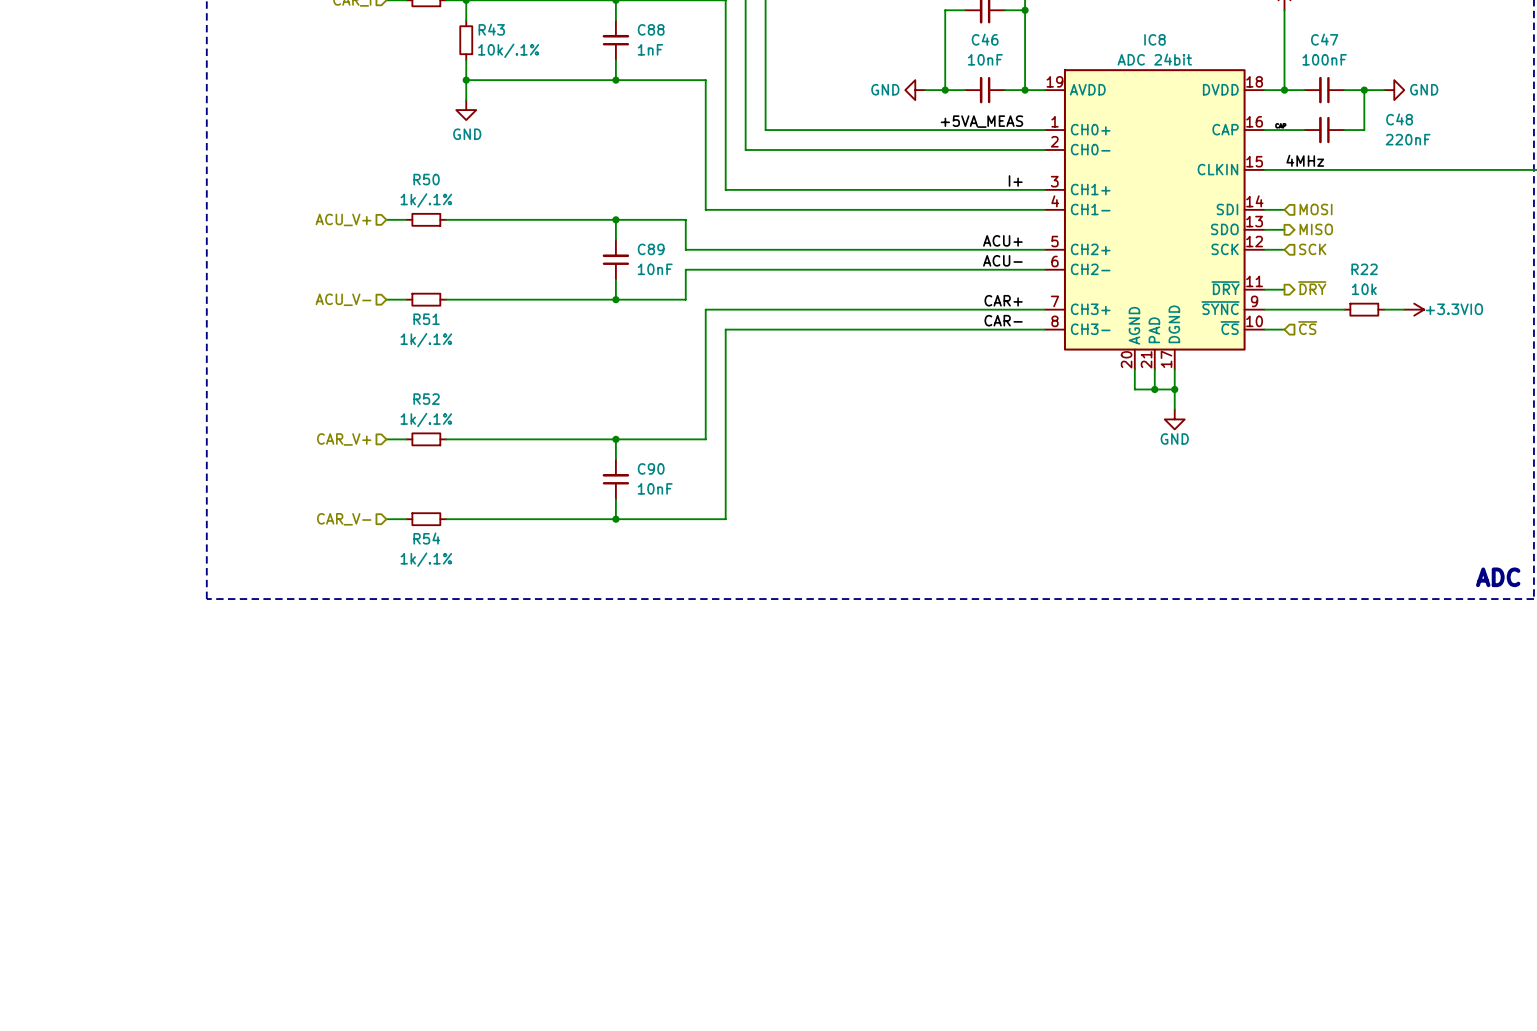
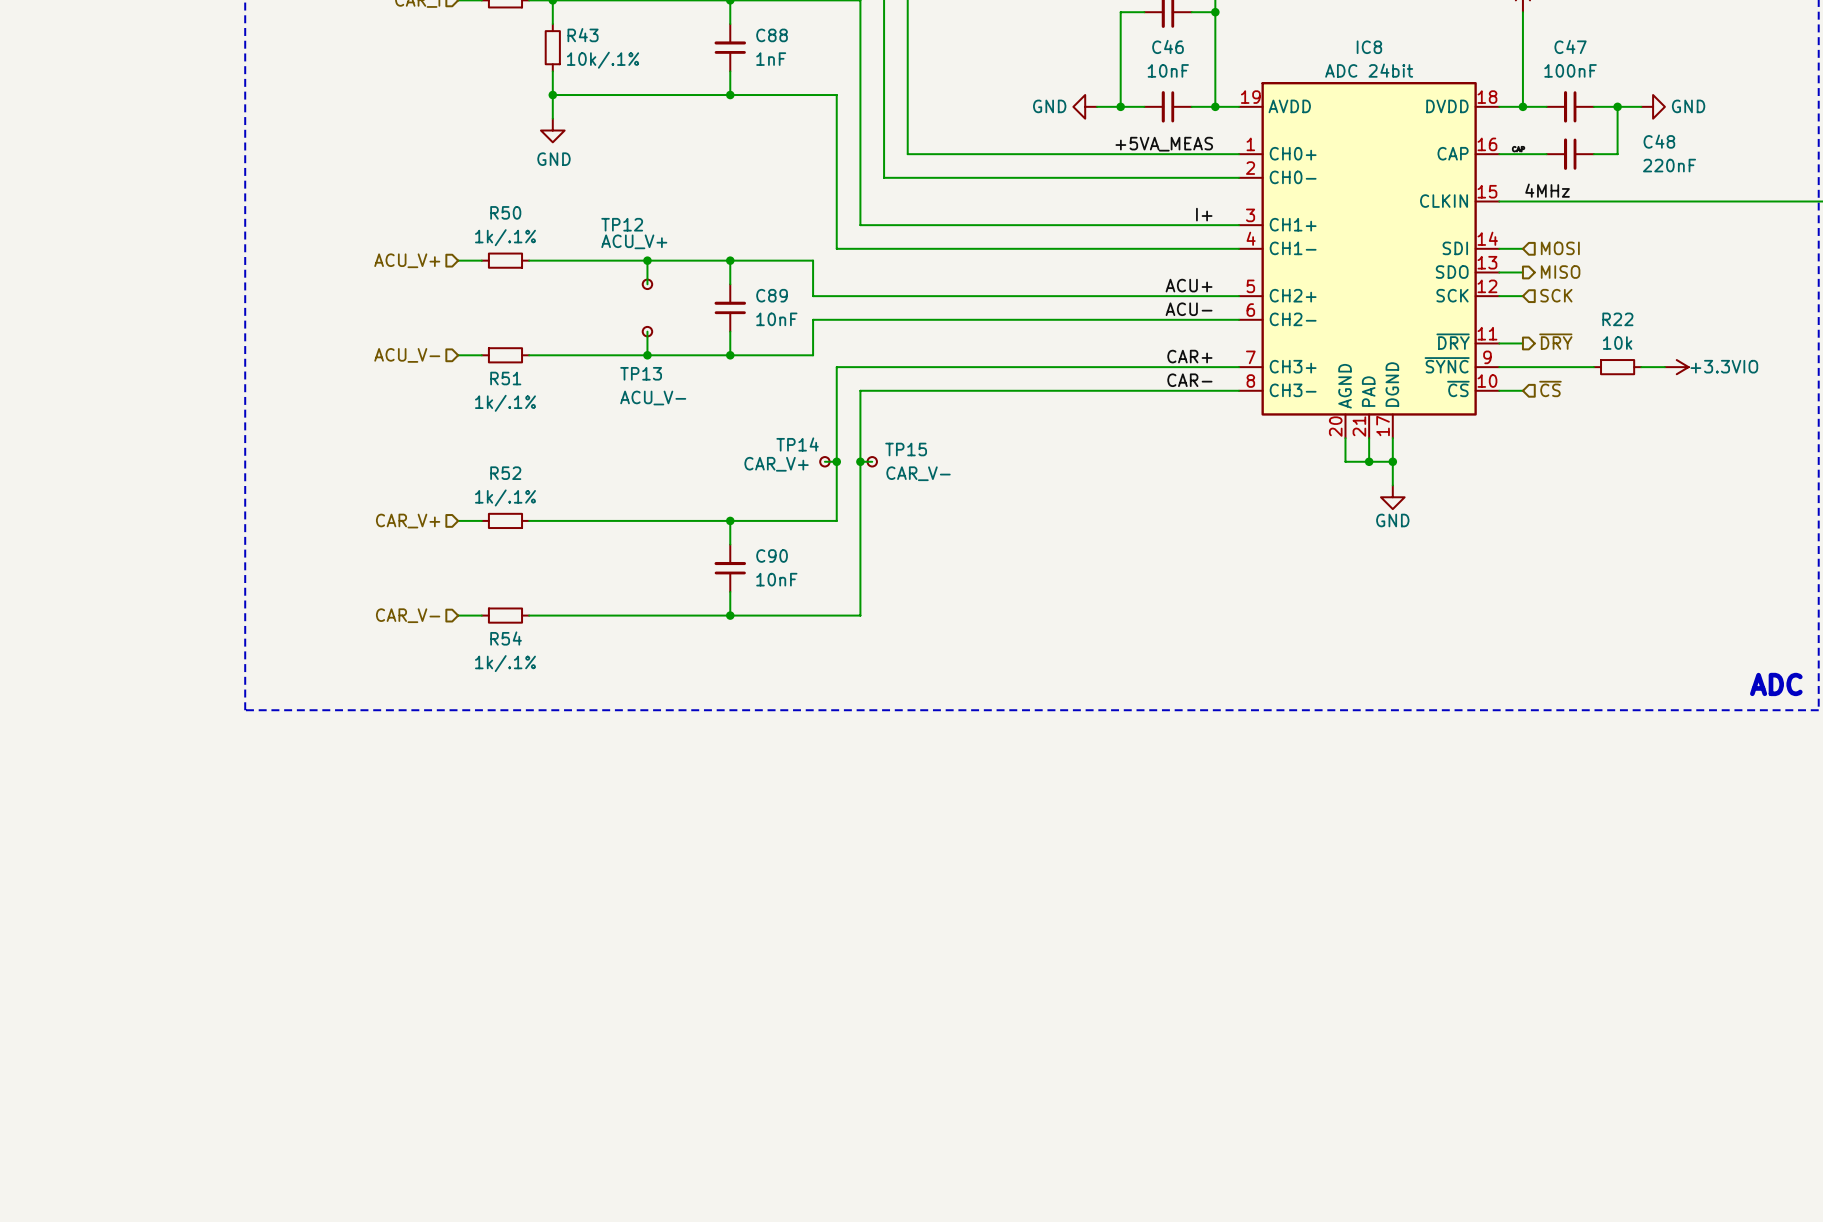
wire: none -> (647, 260) (647, 284)
junction: none -> (647, 260)
TP12: none -> ACU_V+ (647, 284)
wire: none -> (647, 331) (647, 355)
TP13: none -> ACU_V- (647, 331)
junction: none -> (647, 355)
wire: none -> (824, 461) (836, 461)
TP14: none -> CAR_V+ (824, 461)
junction: none -> (836, 461)
wire: none -> (860, 461) (872, 461)
junction: none -> (860, 461)
TP15: none -> CAR_V- (872, 461)

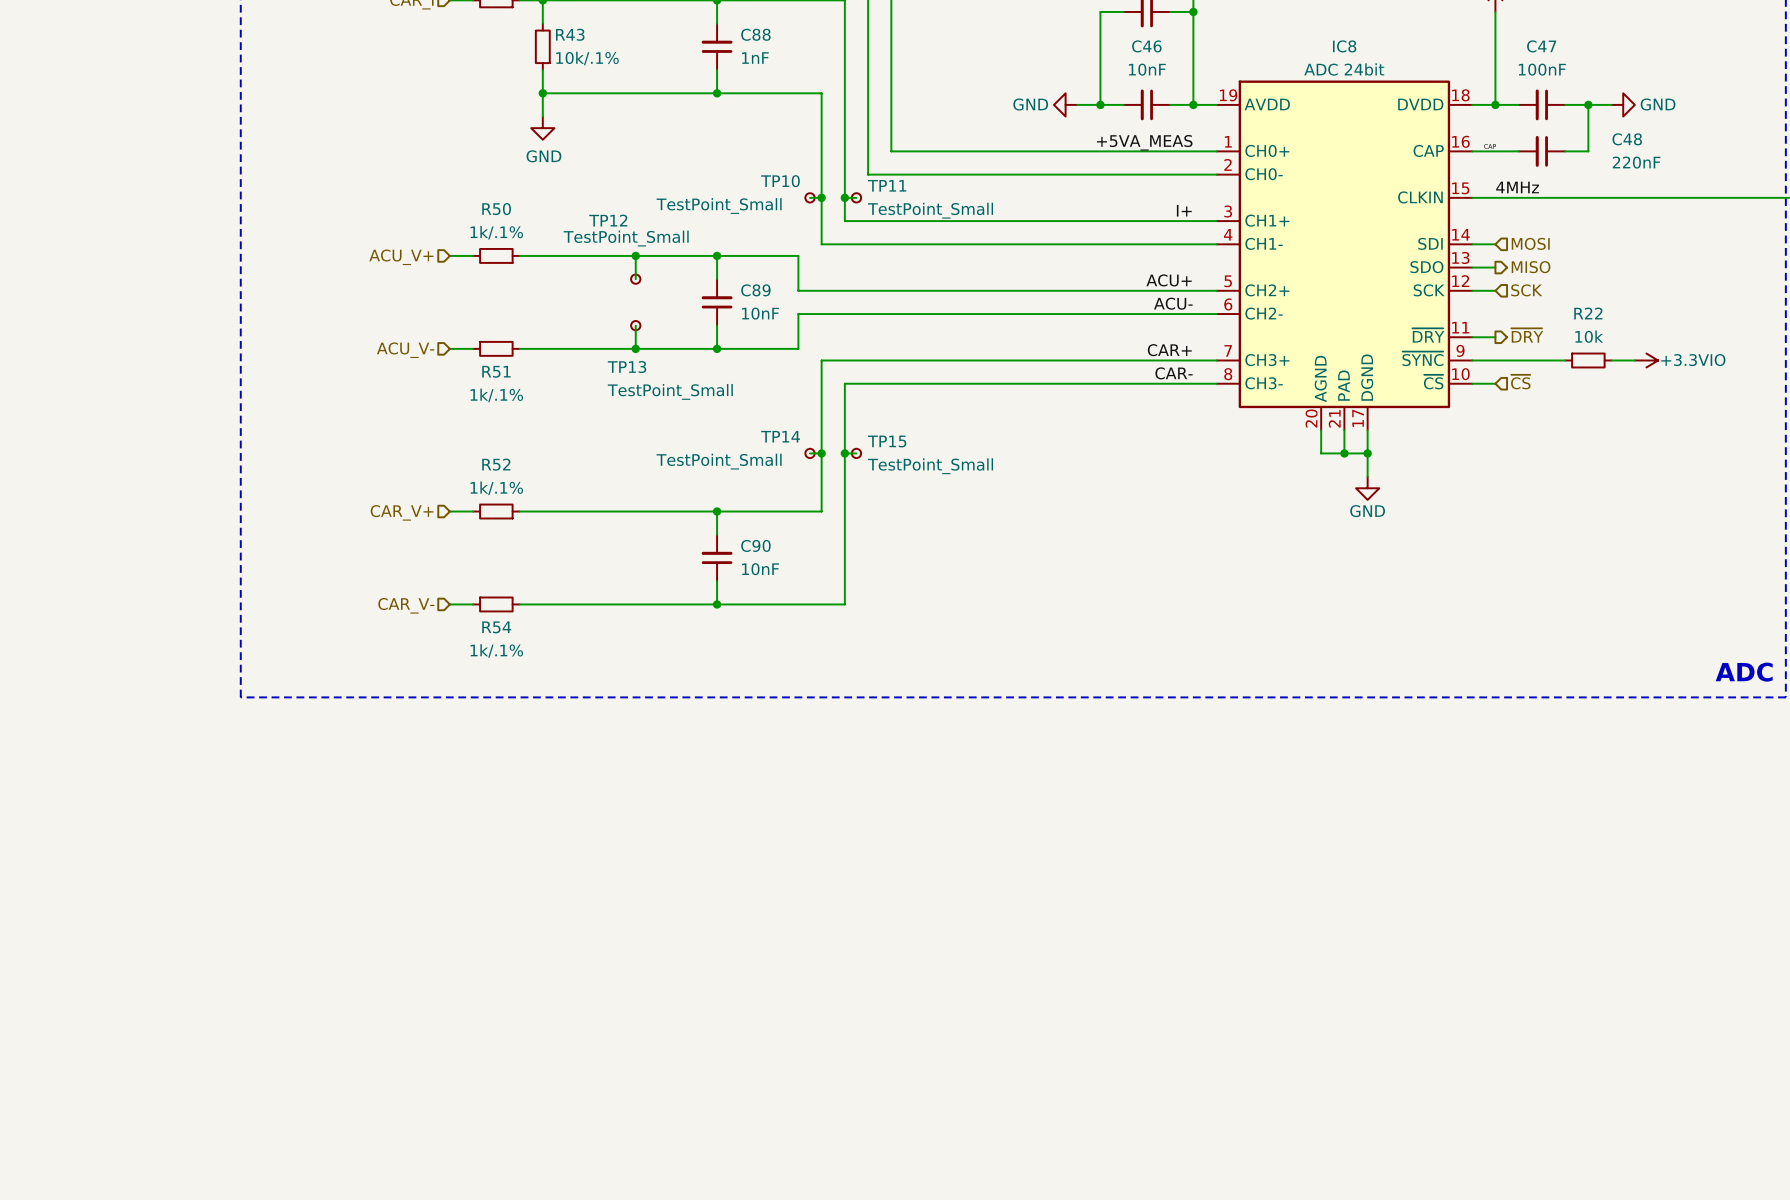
wire: none -> (810, 197) (821, 197)
TP10: none -> TestPoint_Small (810, 197)
junction: none -> (821, 197)
wire: none -> (844, 197) (856, 197)
junction: none -> (844, 197)
TP11: none -> TestPoint_Small (856, 197)
TP12 value: ACU_V+ (634, 241) -> TestPoint_Small (626, 238)
TP13 value: ACU_V- (653, 398) -> TestPoint_Small (670, 391)
TP14 value: CAR_V+ (776, 464) -> TestPoint_Small (719, 461)
TP15 value: CAR_V- (918, 473) -> TestPoint_Small (930, 466)

